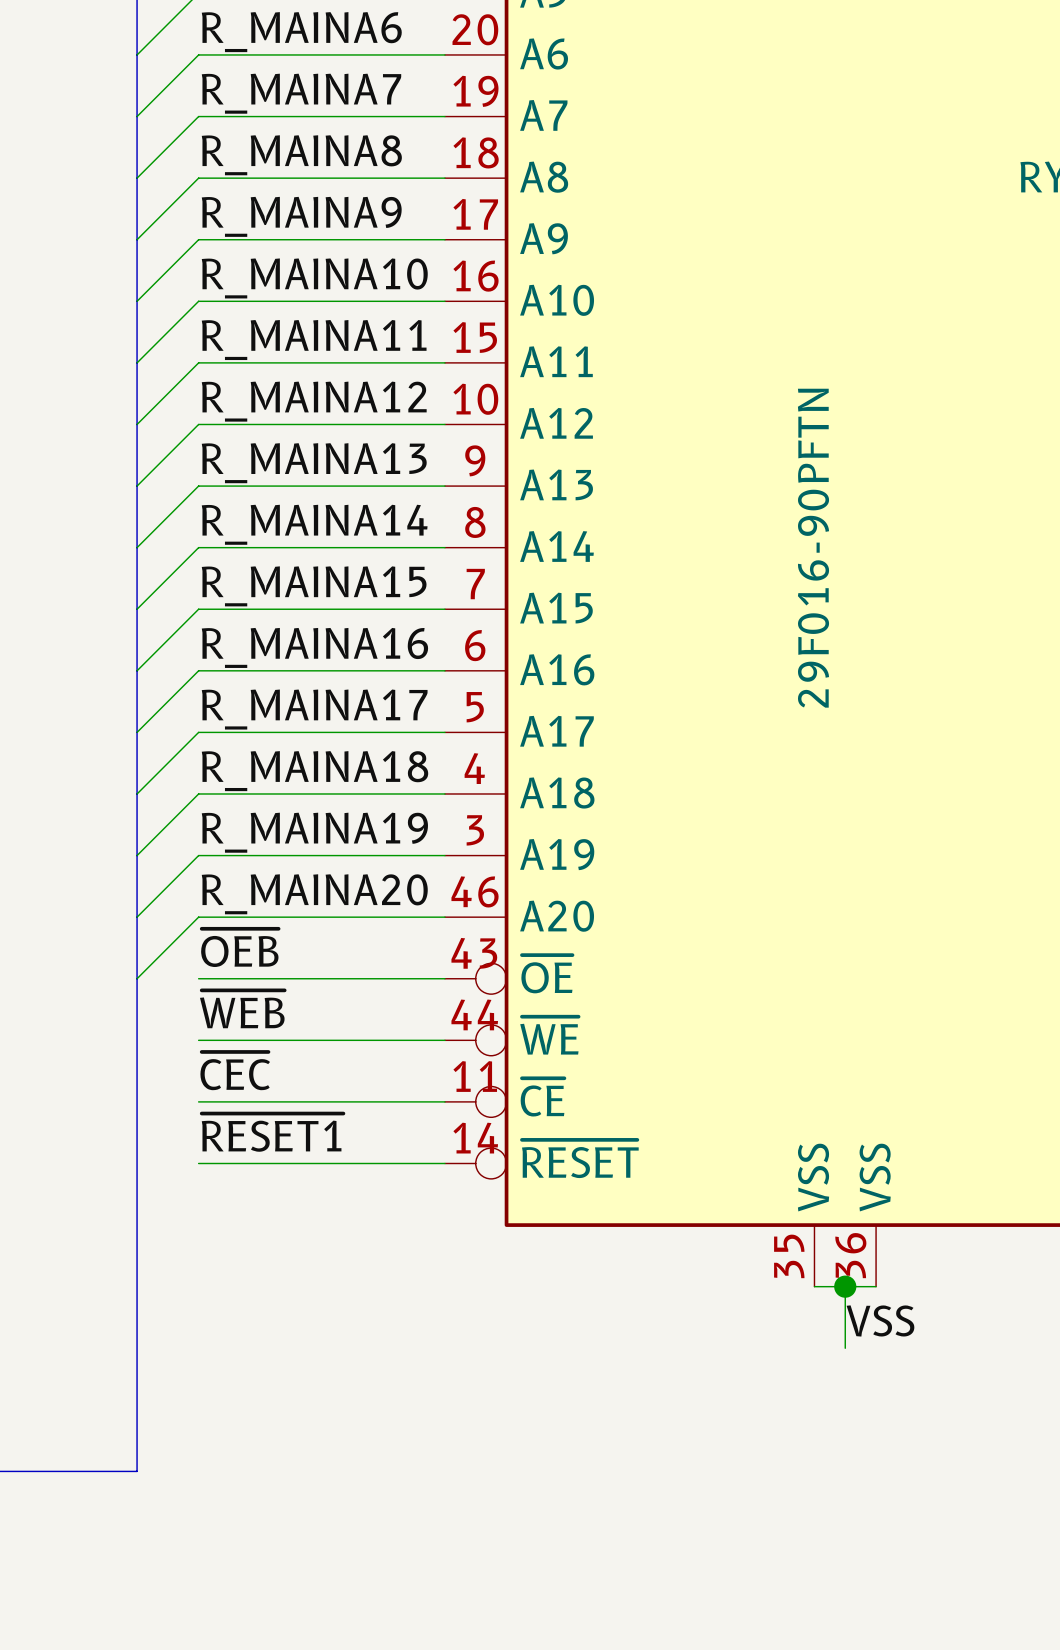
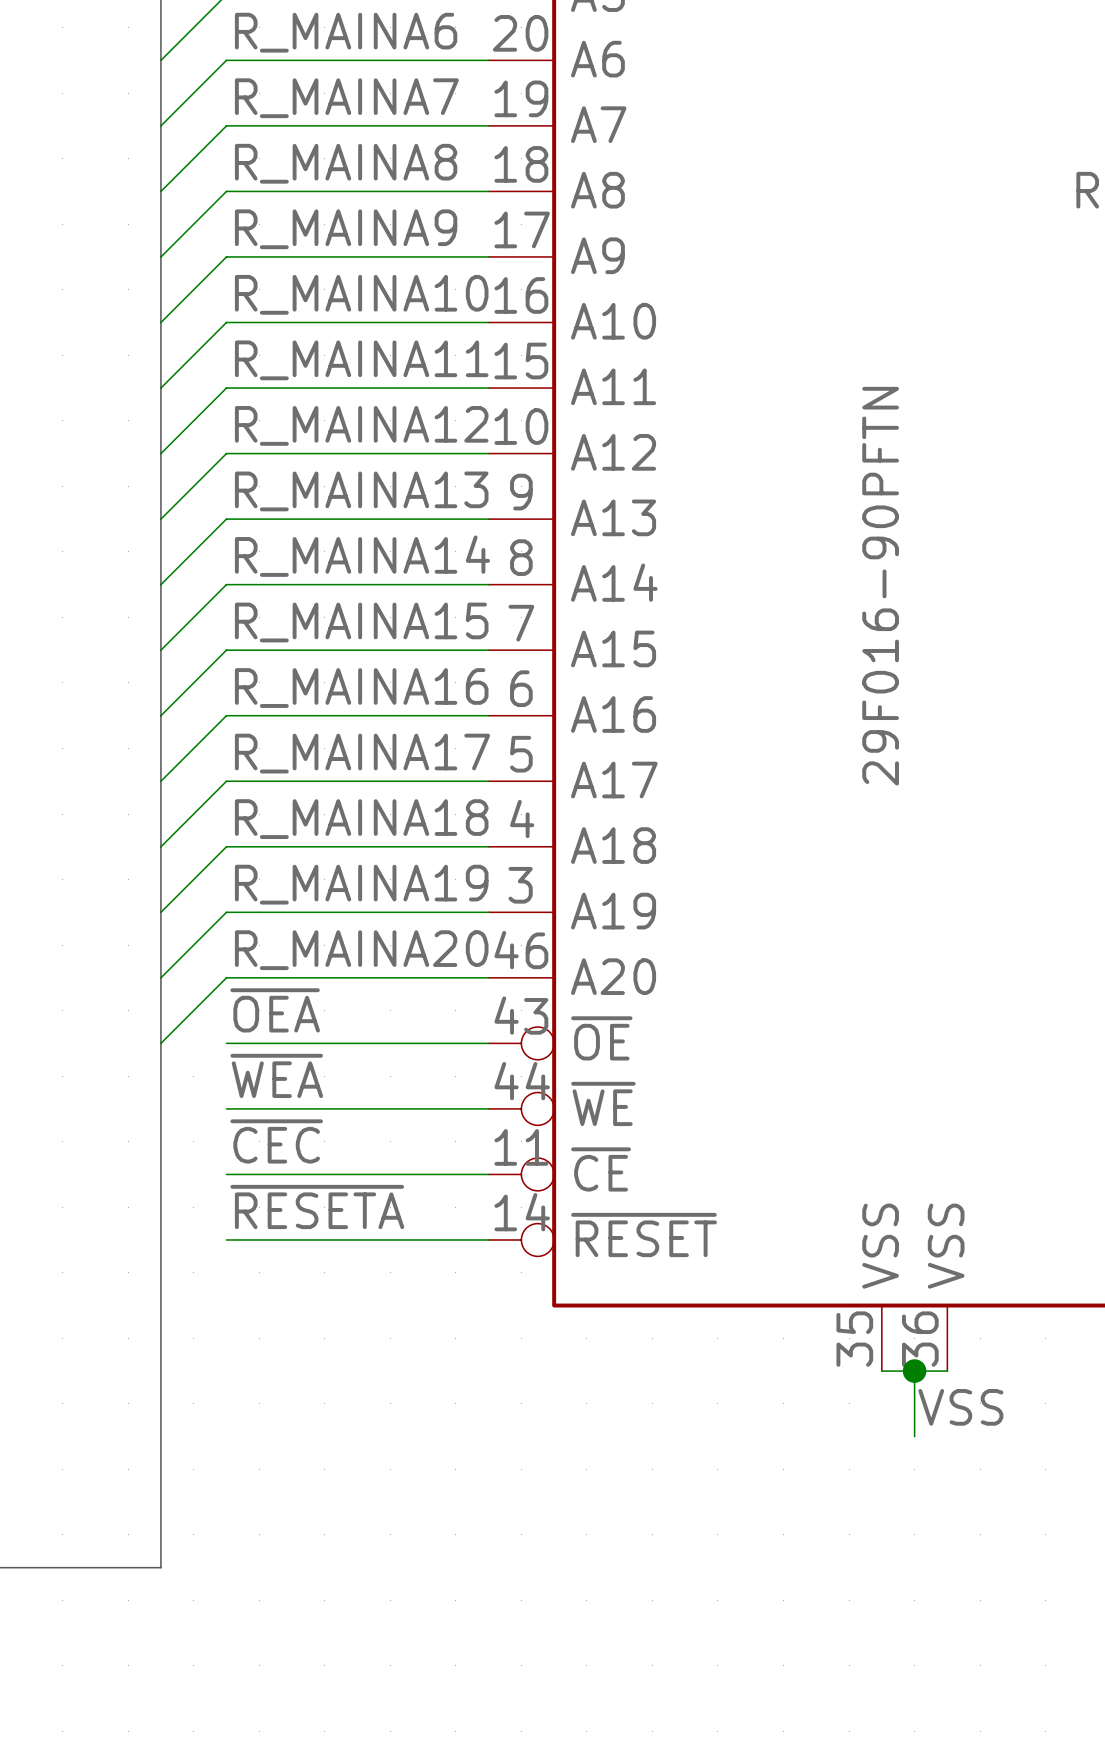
label: ~{OEB} (239, 947) -> ~{OEA} (275, 1010)
label: ~{WEB} (242, 1009) -> ~{WEA} (276, 1075)
label: ~{RESET1} (272, 1132) -> ~{RESETA} (317, 1206)

